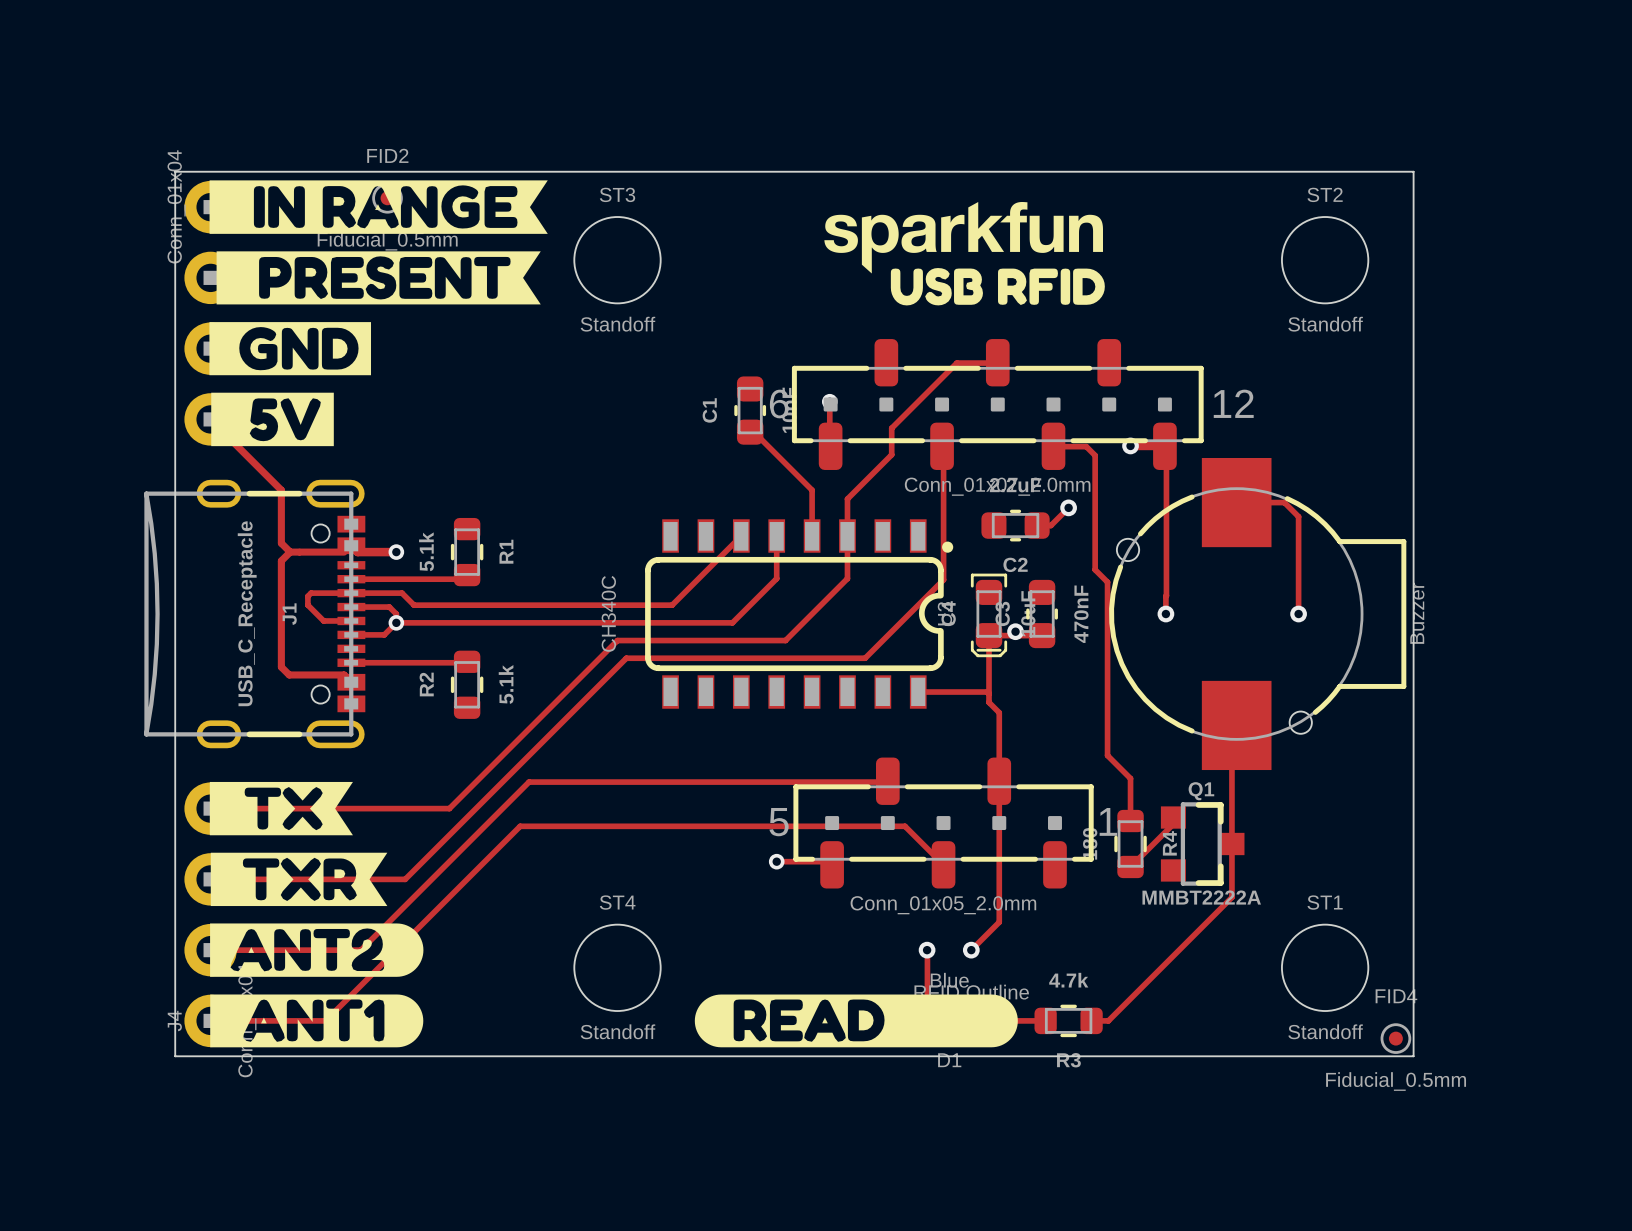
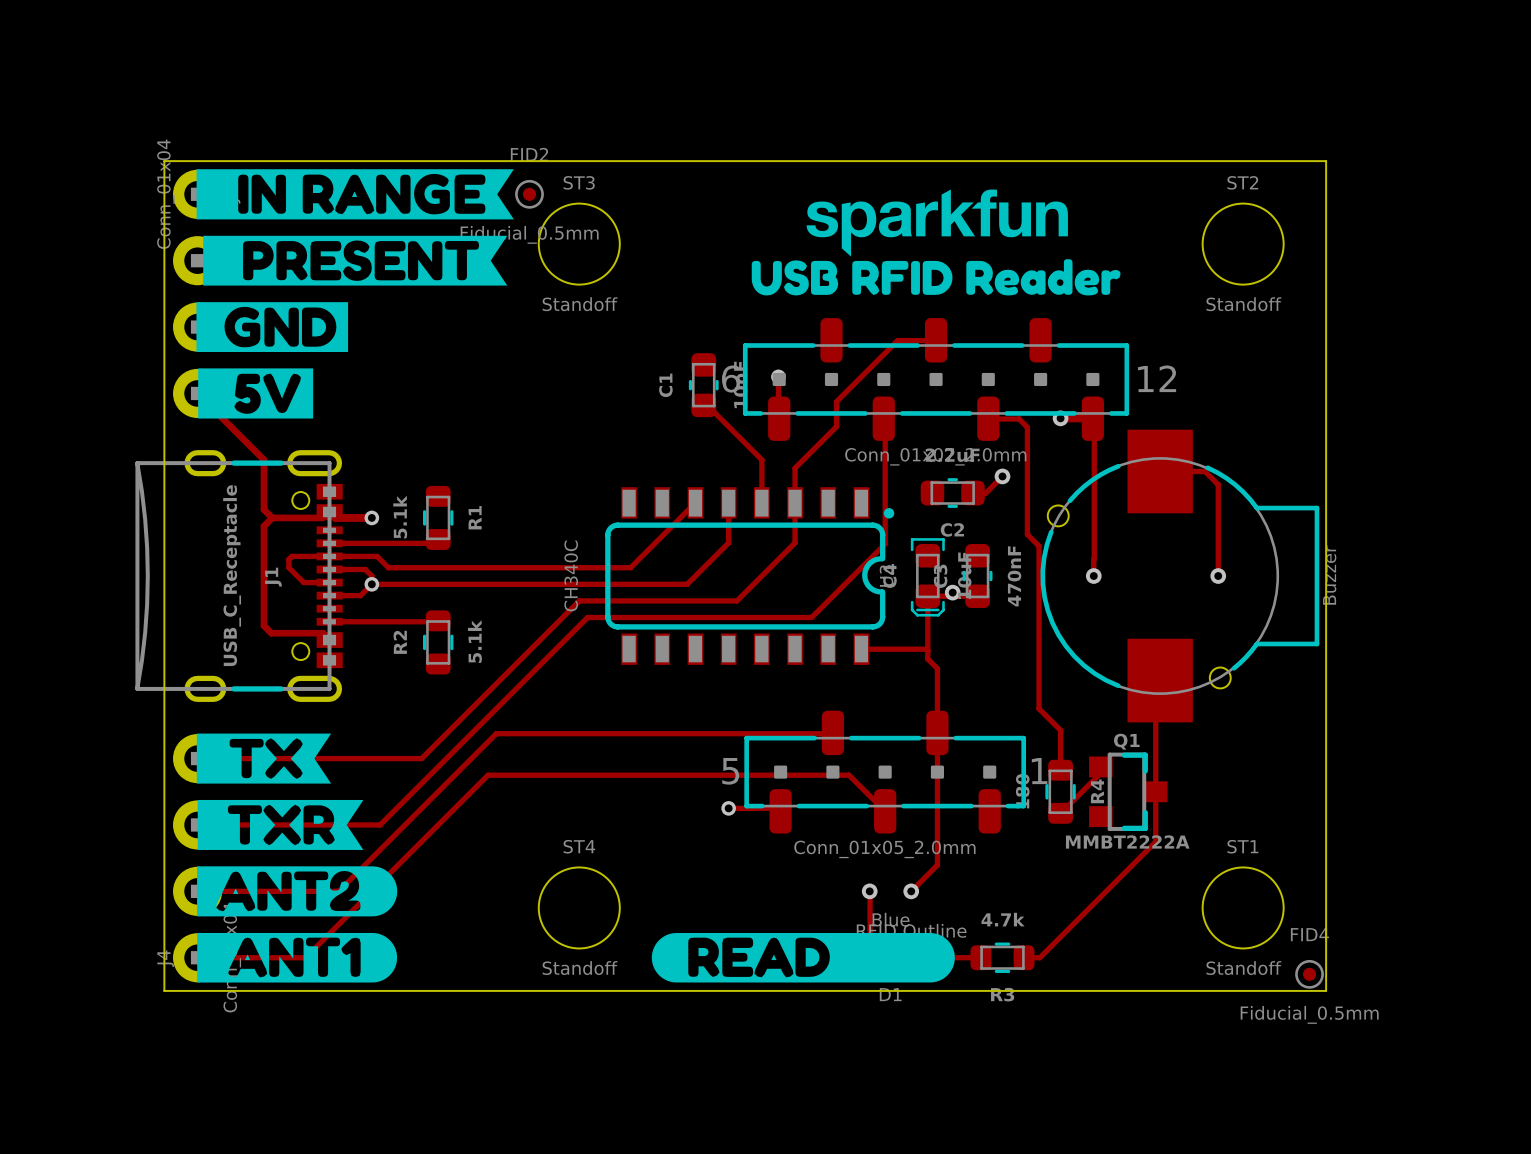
FID2 position: (387, 198) -> (529, 194)
drawing position: (963, 237) -> (937, 223)
drawing shape: [890, 268, 1105, 306] -> [751, 259, 1121, 296]

